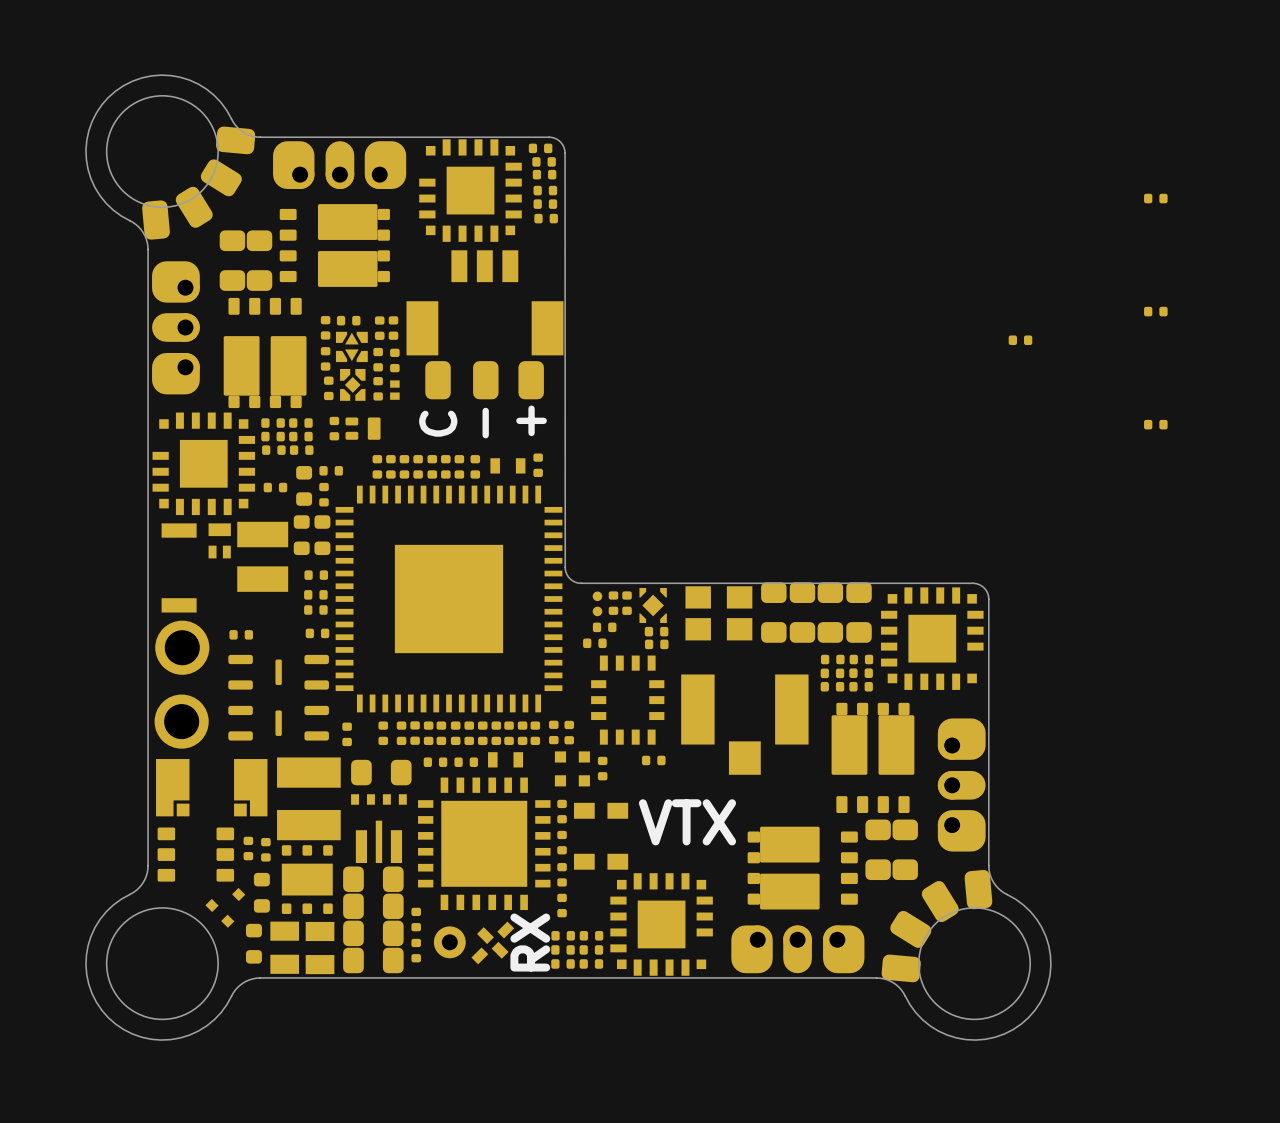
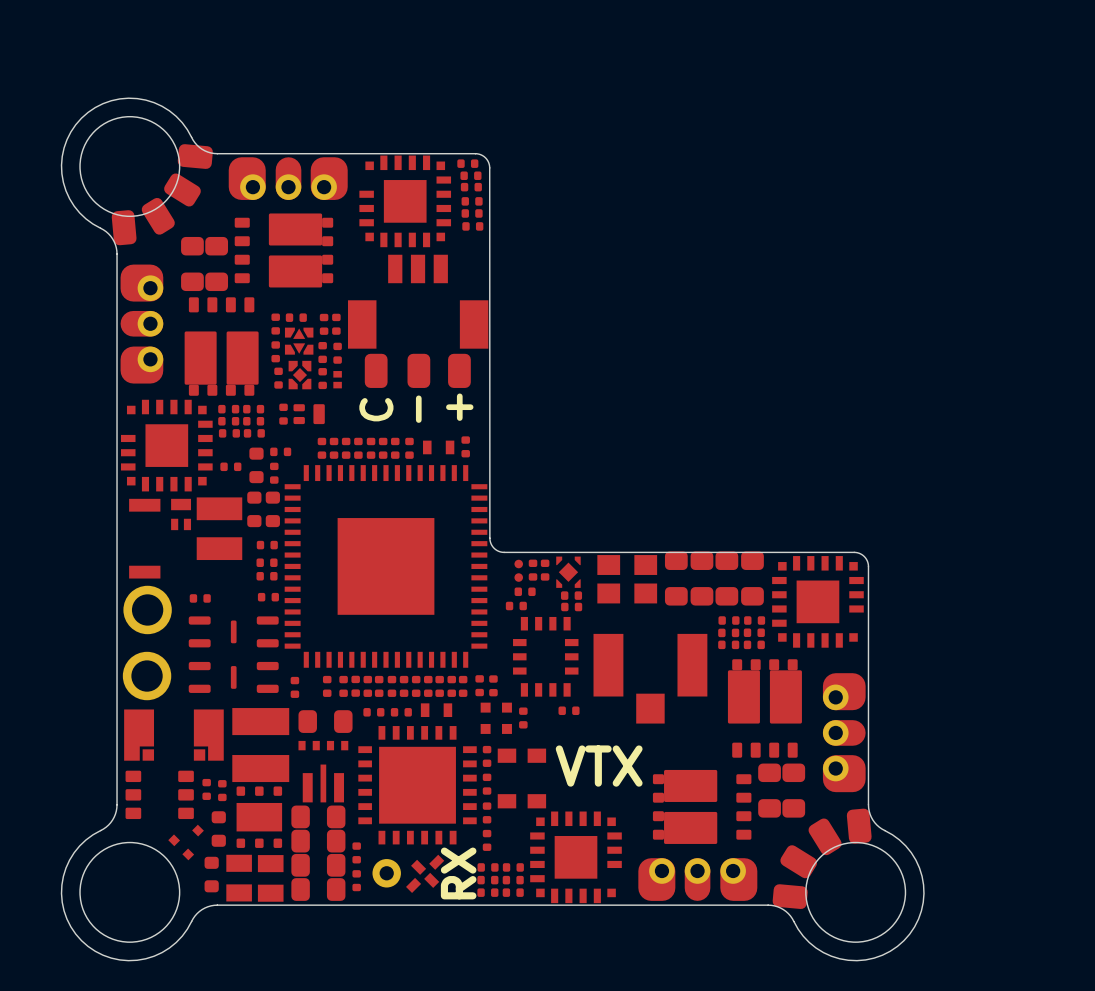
part: (1155, 198) -> none
part: (1155, 311) -> none
part: (1020, 340) -> none
part: (1155, 424) -> none

